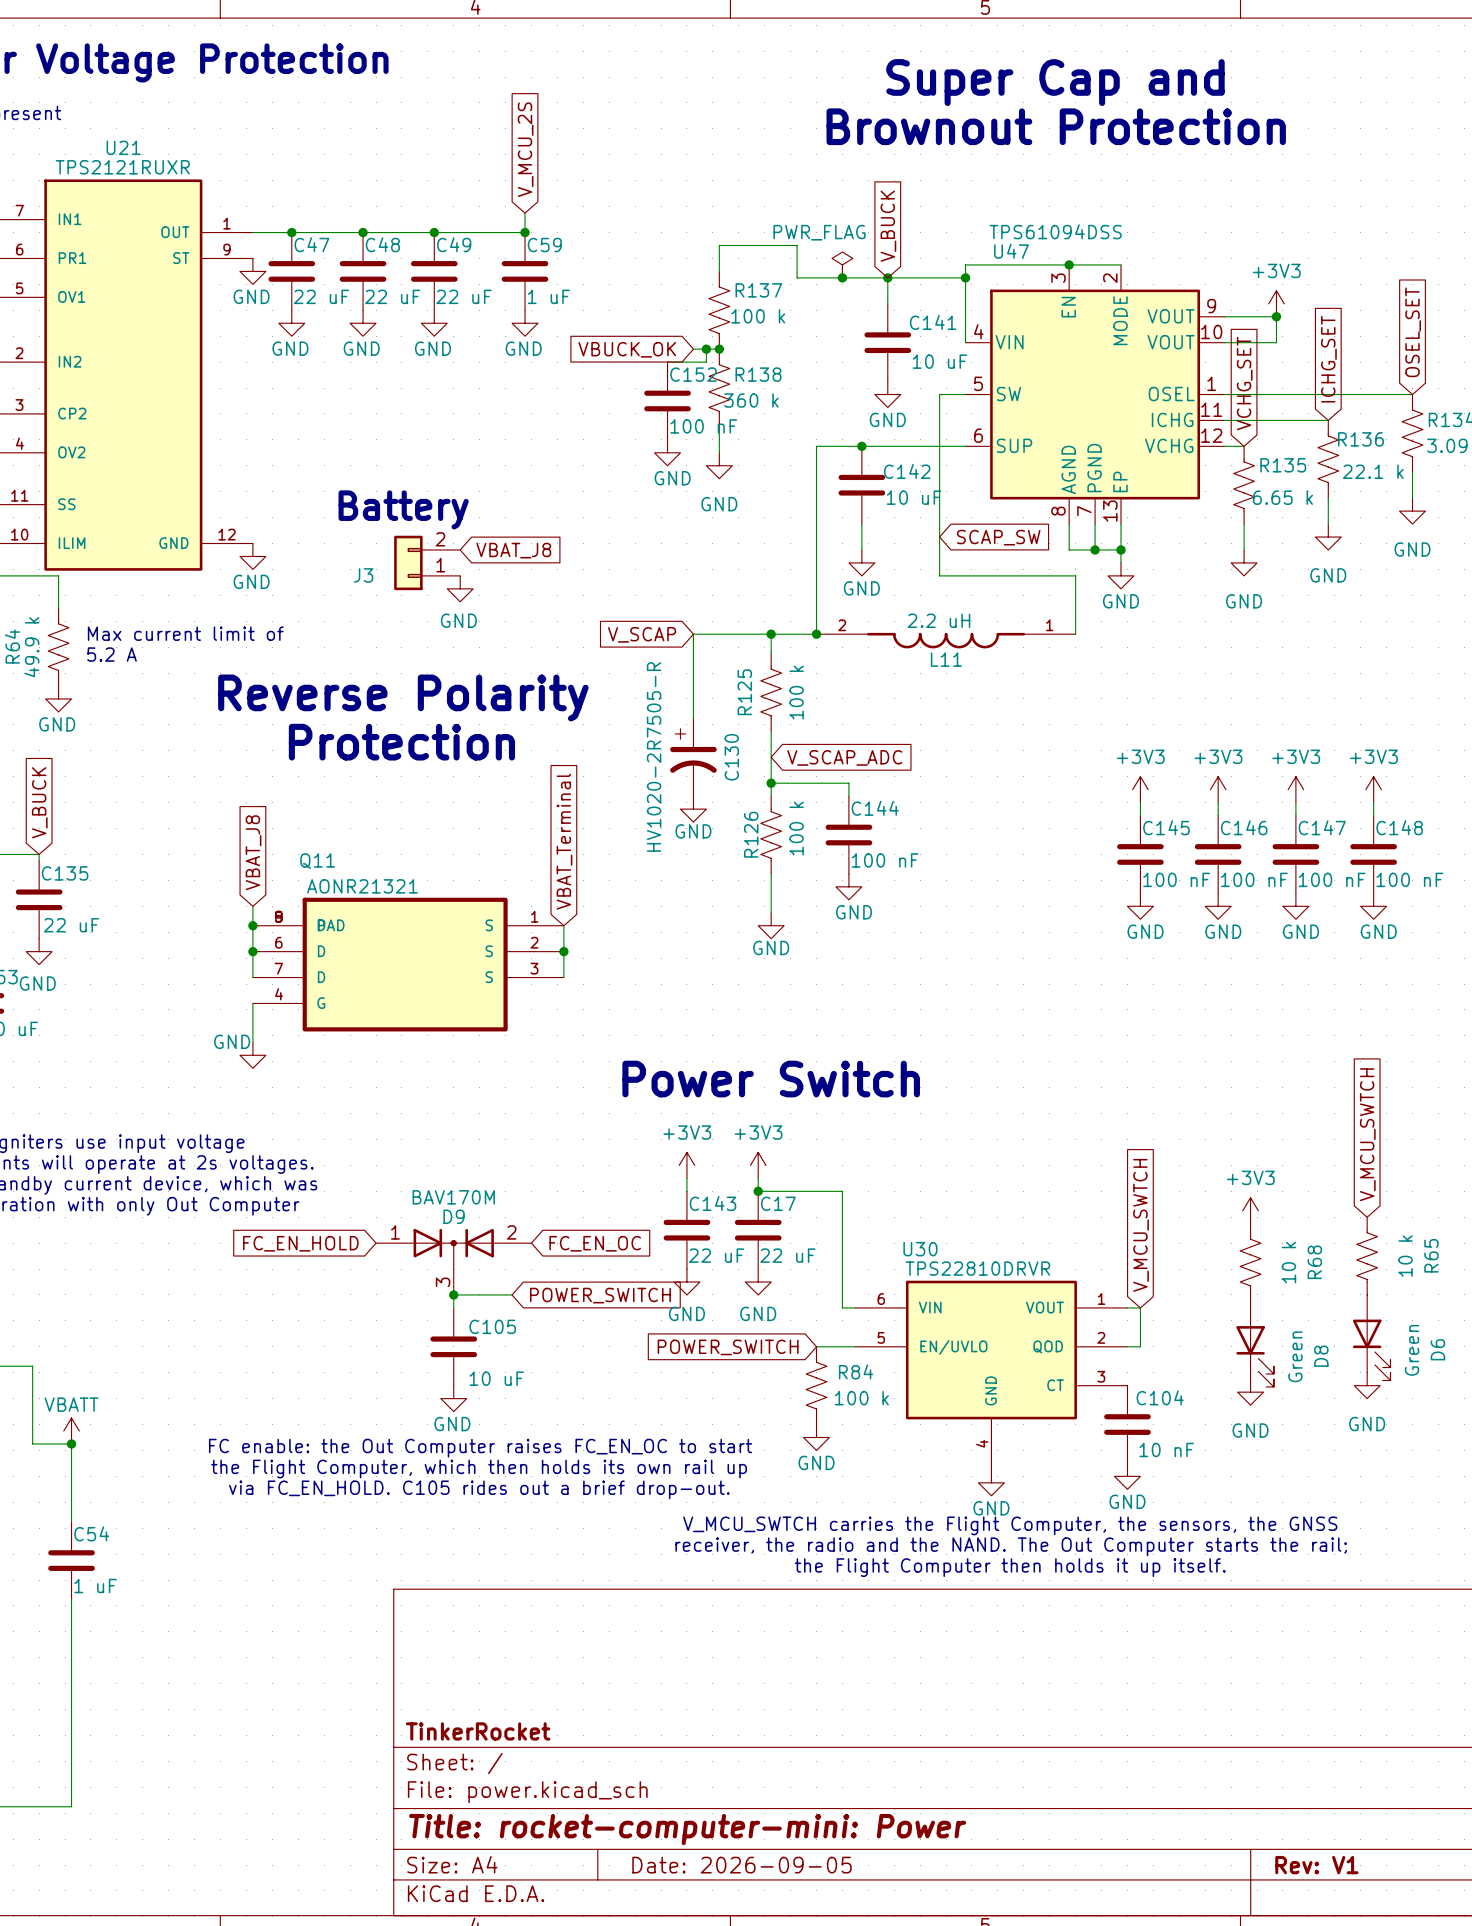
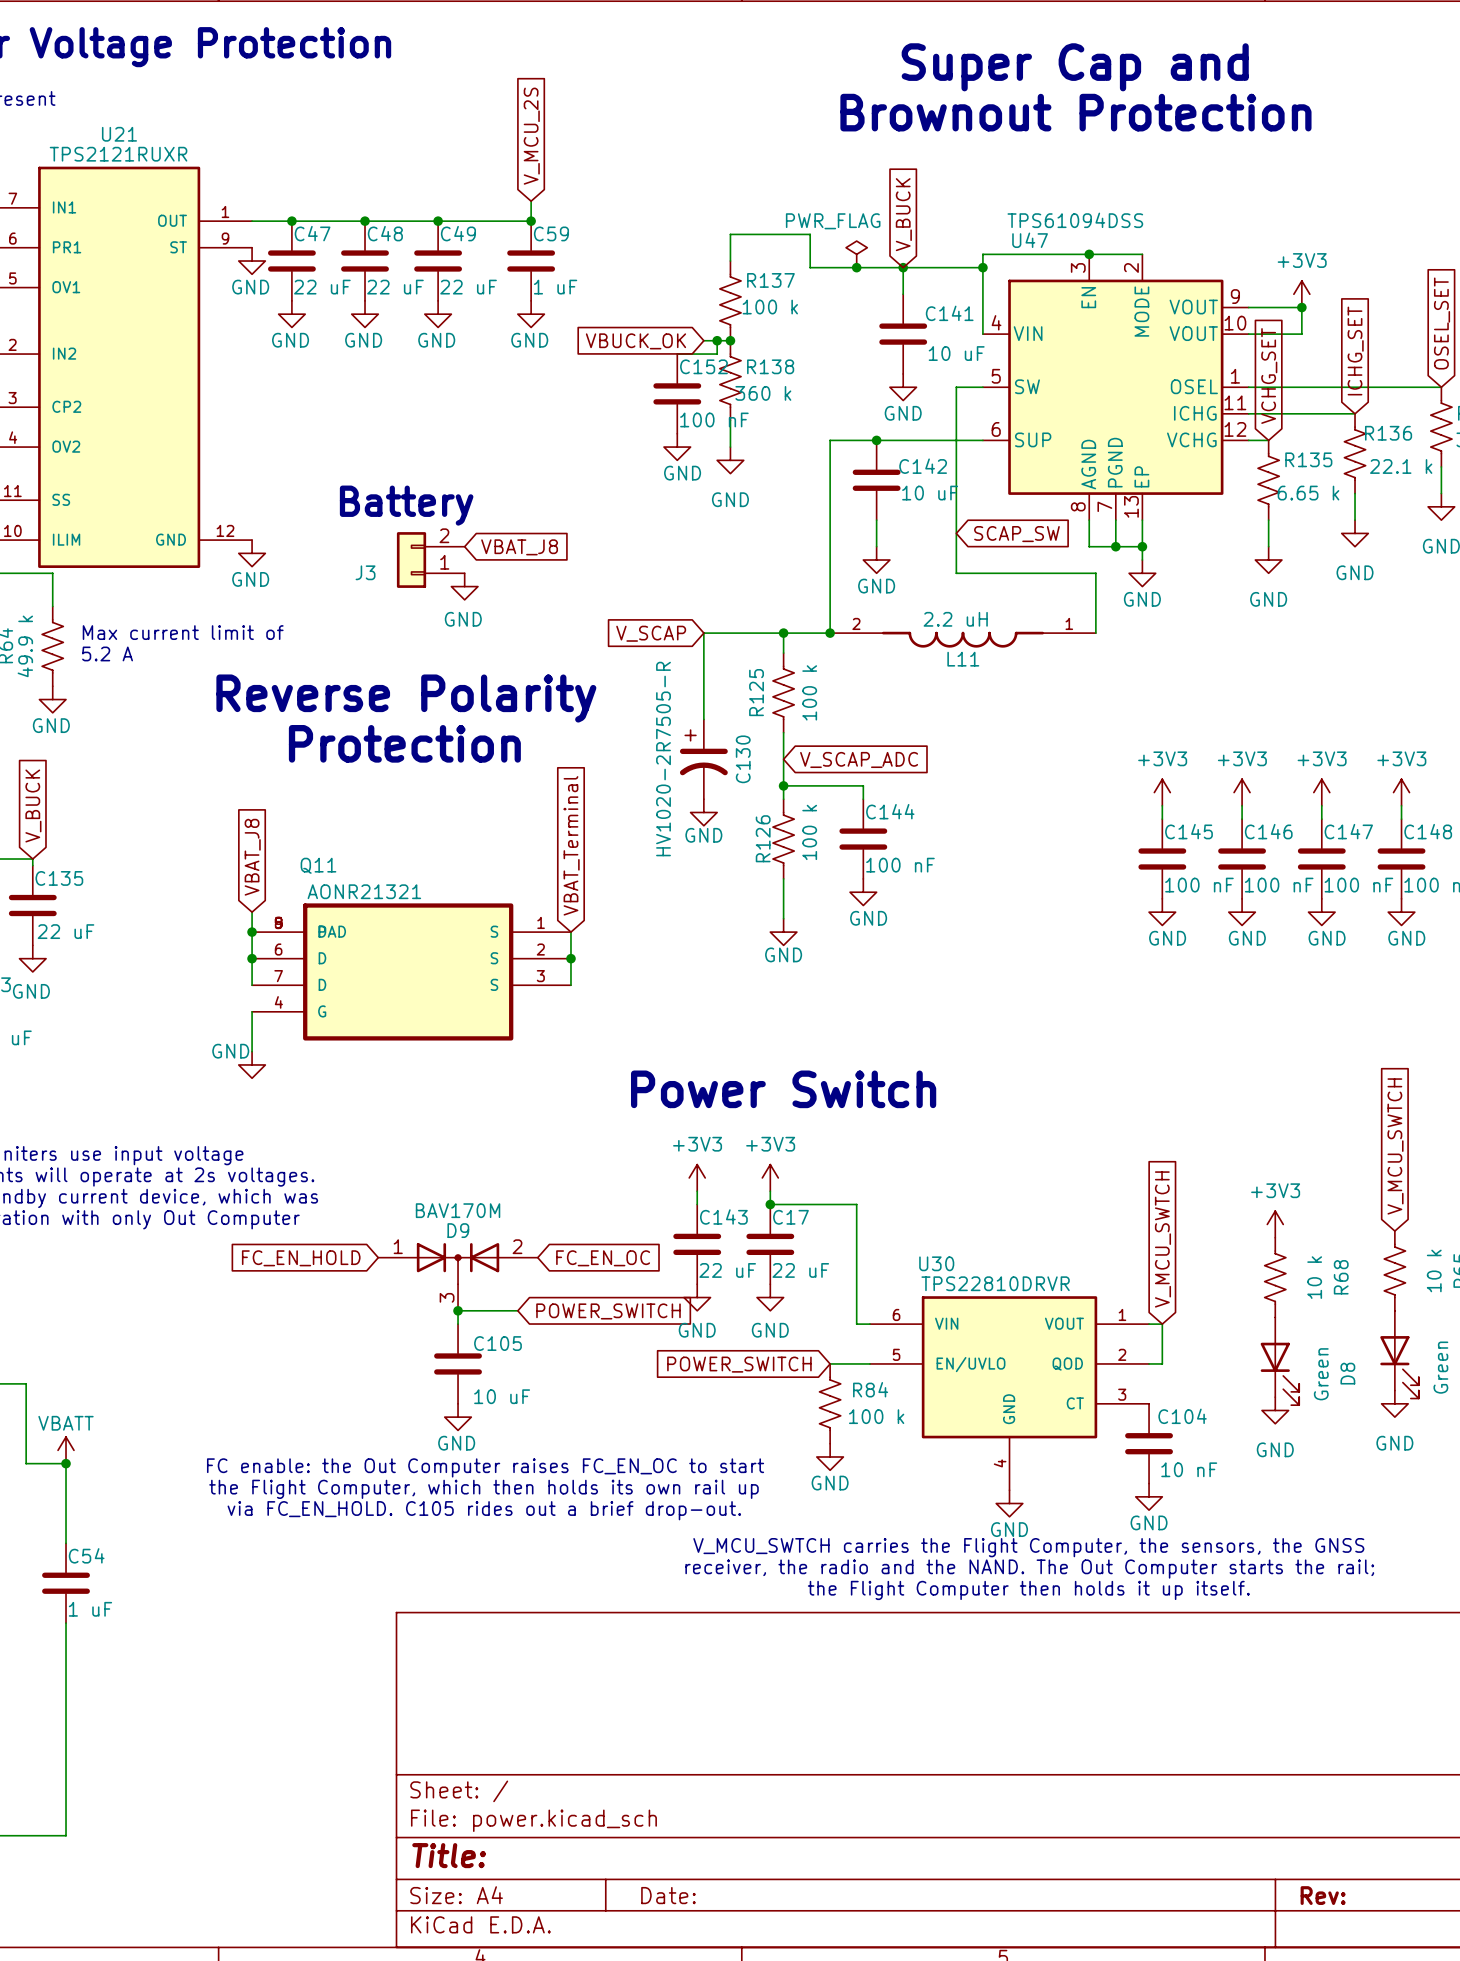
title block: TinkerRocket (478, 1731) -> none
title block: Title: rocket-computer-mini: Power (687, 1829) -> Title: (449, 1855)
title block: Date: 2026-09-05 (742, 1865) -> Date: (668, 1895)
title block: Rev: V1 (1316, 1865) -> Rev: (1323, 1895)

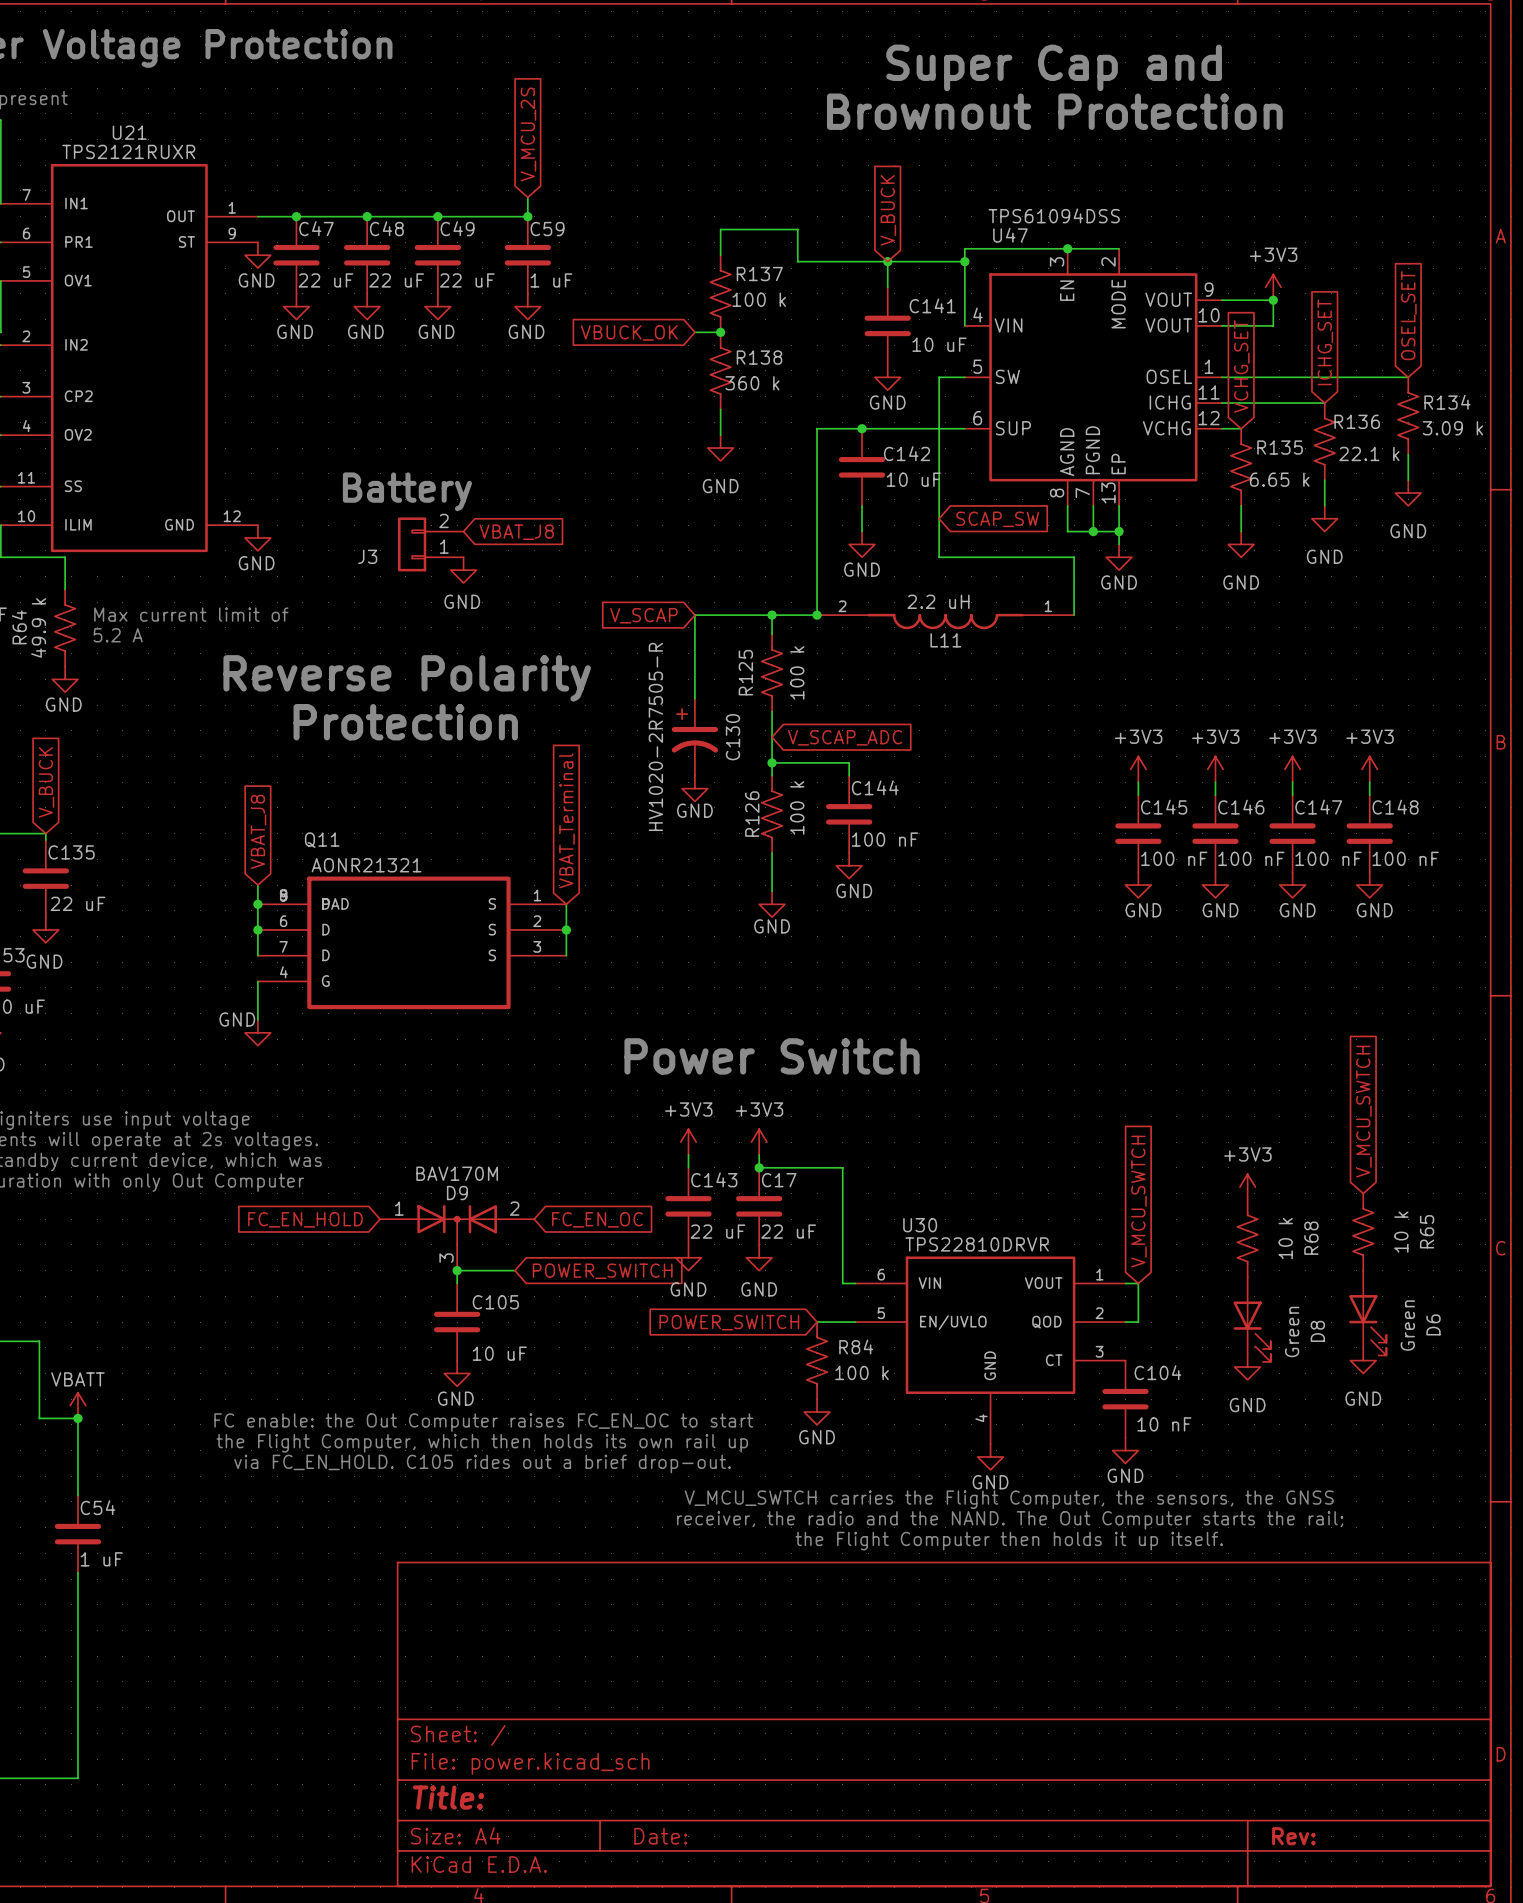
power symbol: PWR_FLAG (856, 254) -> none
junction: (856, 267) -> none
wire: (717, 340) (717, 354) (677, 354) -> none
junction: (717, 340) -> none
C152: 100 nF (677, 393) -> none
power symbol: GND (677, 447) -> none

